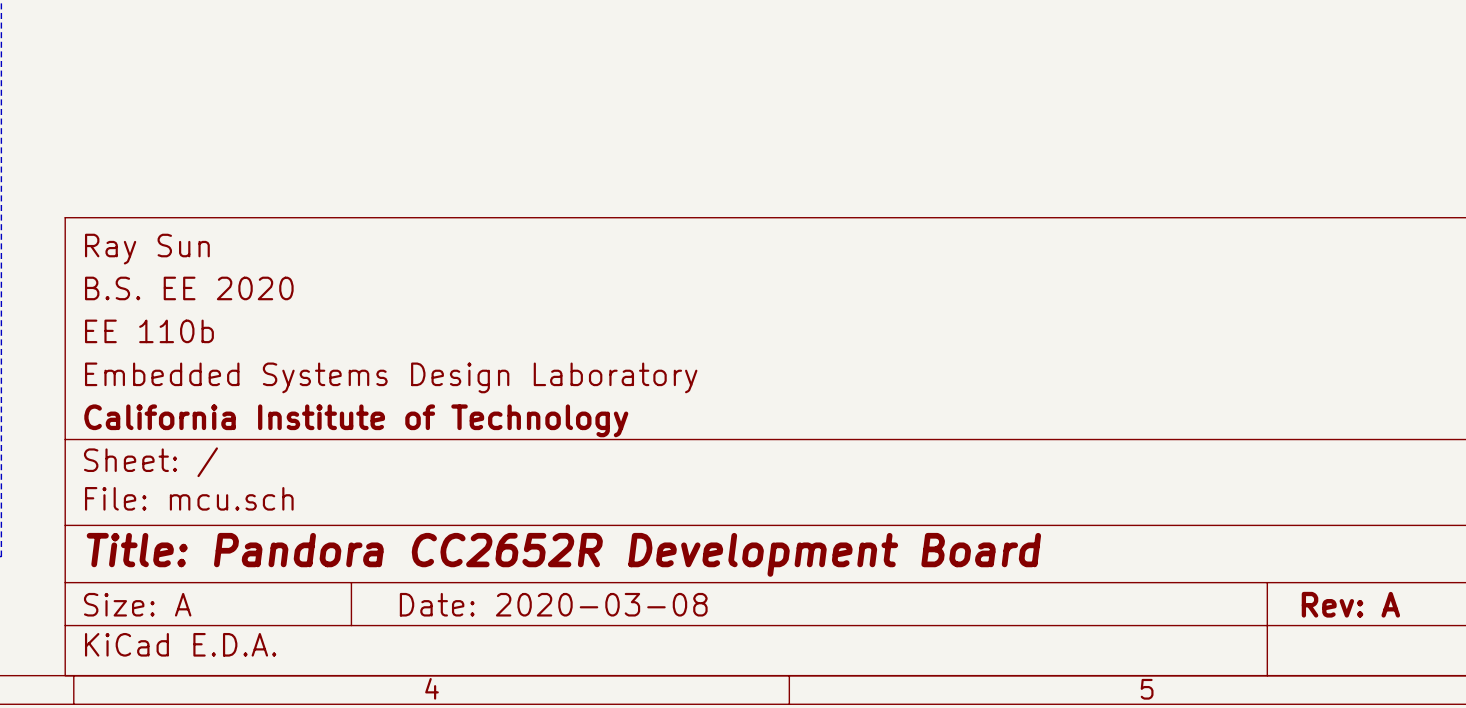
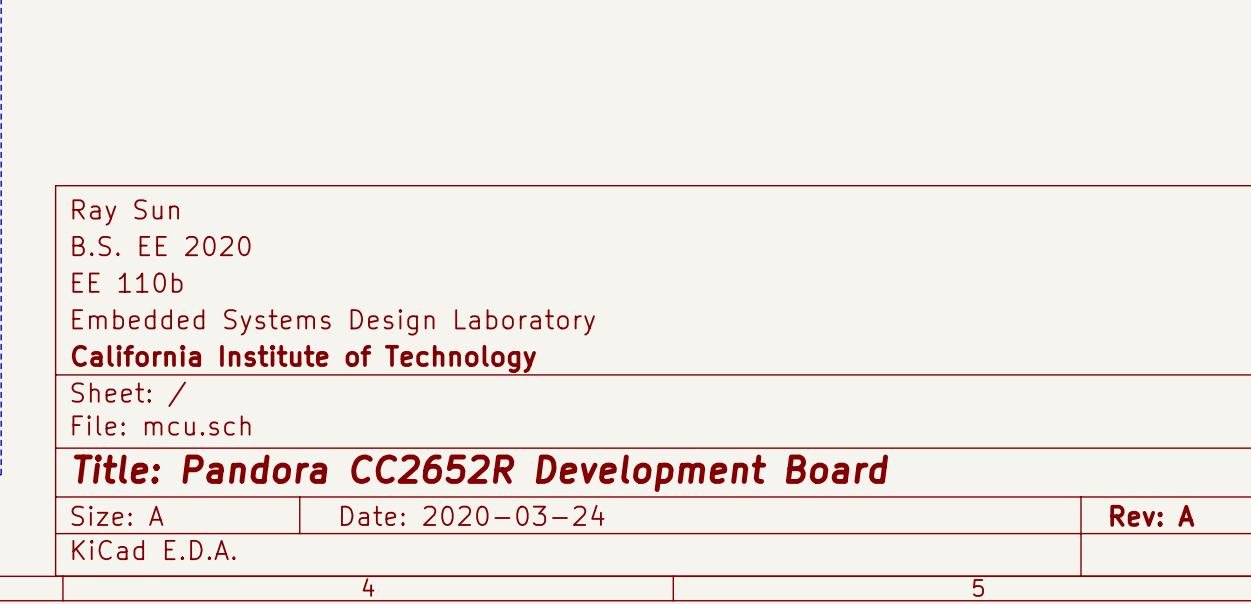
title block: Date: 2020-03-08 (553, 604) -> Date: 2020-03-24 (472, 515)

